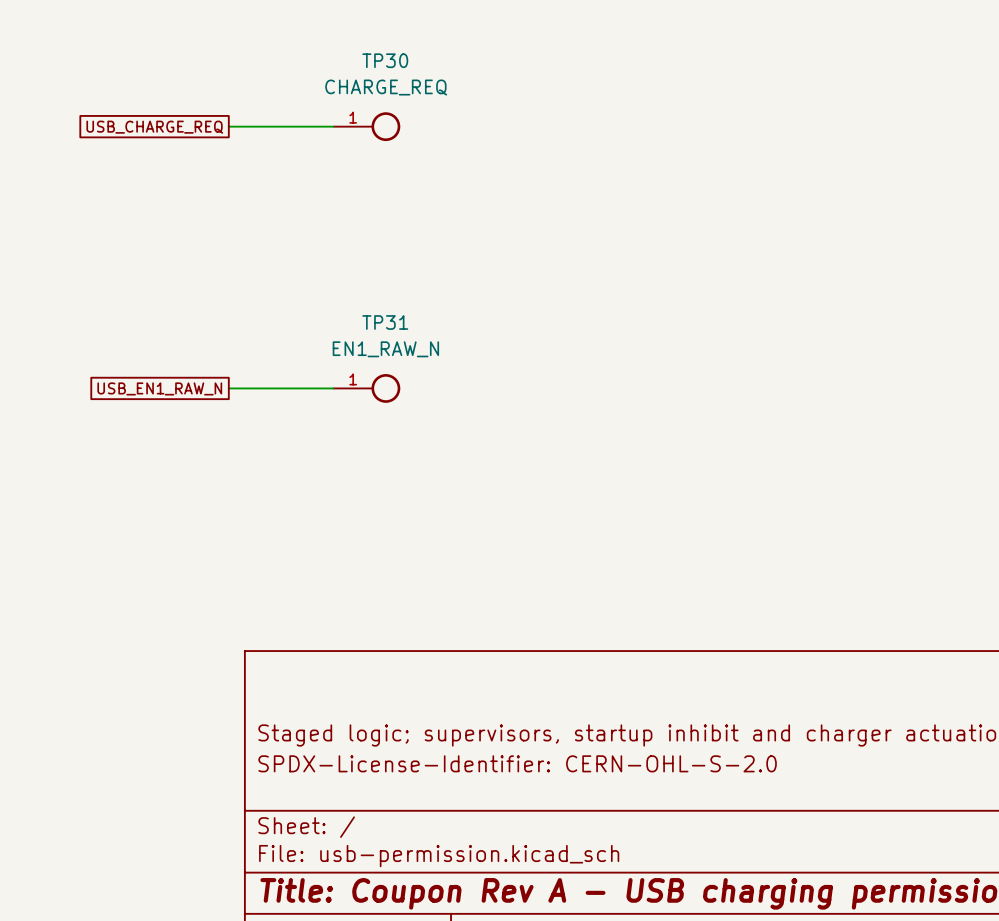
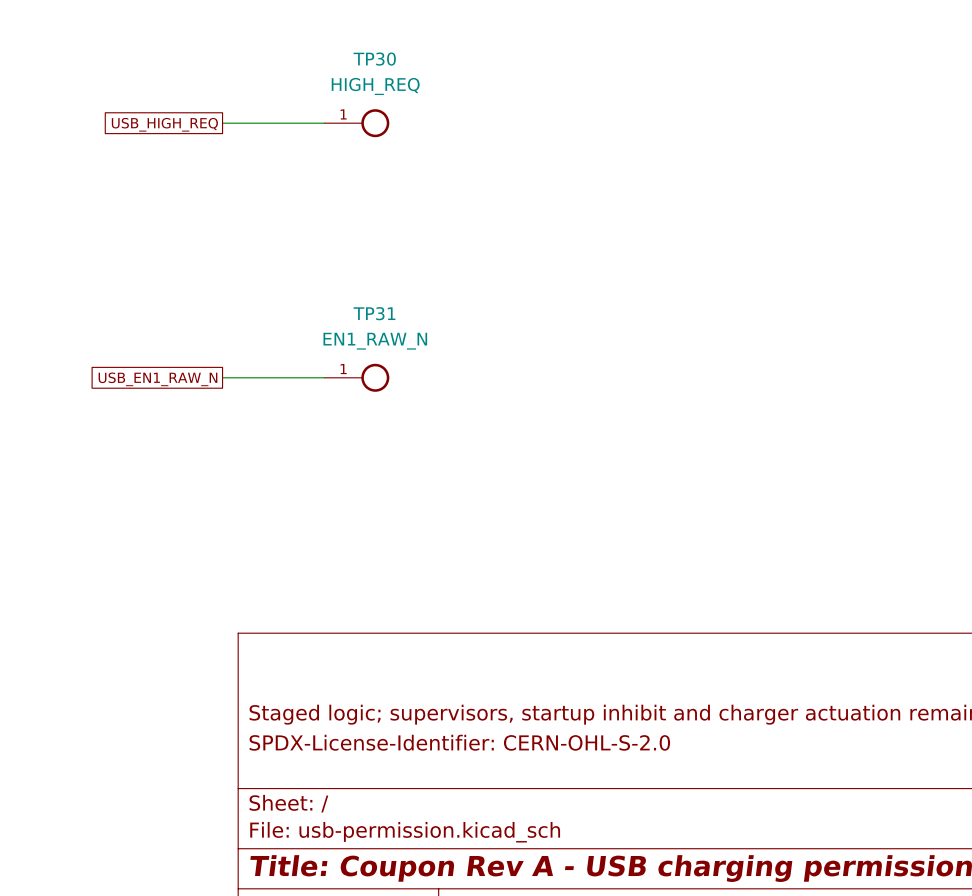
TP30 value: CHARGE_REQ (386, 87) -> HIGH_REQ (375, 86)
global label: USB_CHARGE_REQ (154, 127) -> USB_HIGH_REQ (164, 124)

